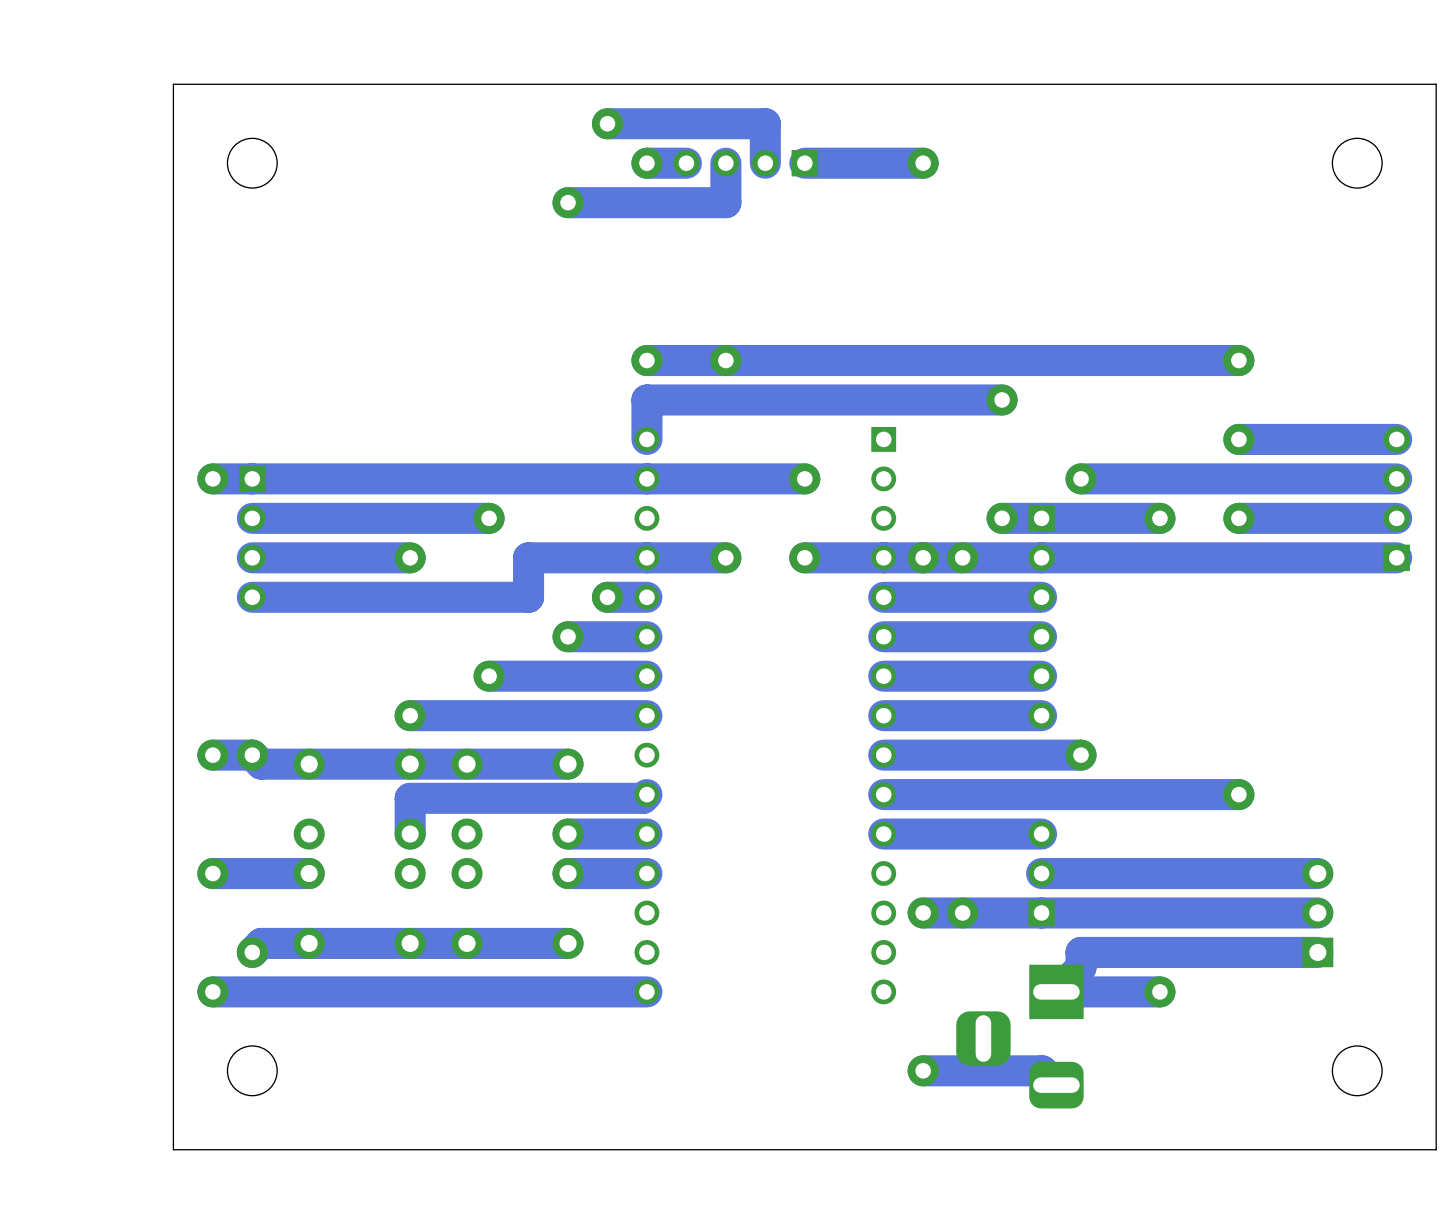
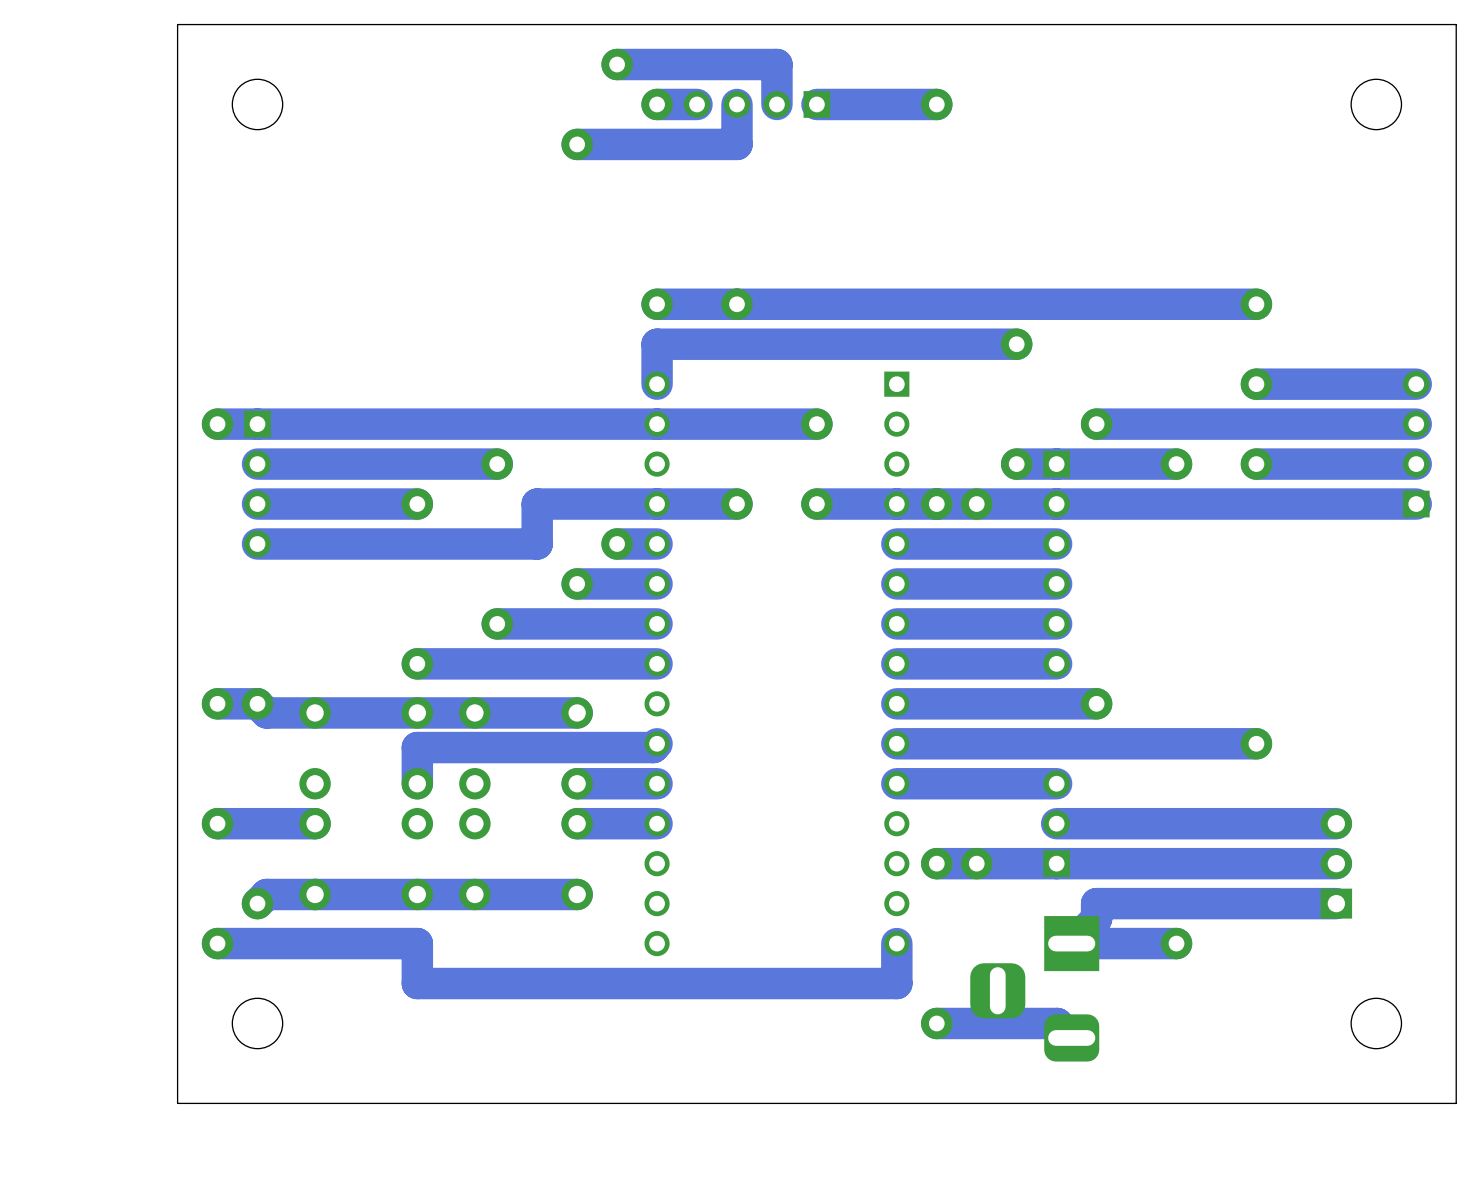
track: (646, 991) (410, 991) -> (896, 943) (896, 983) (417, 983) (417, 943)

